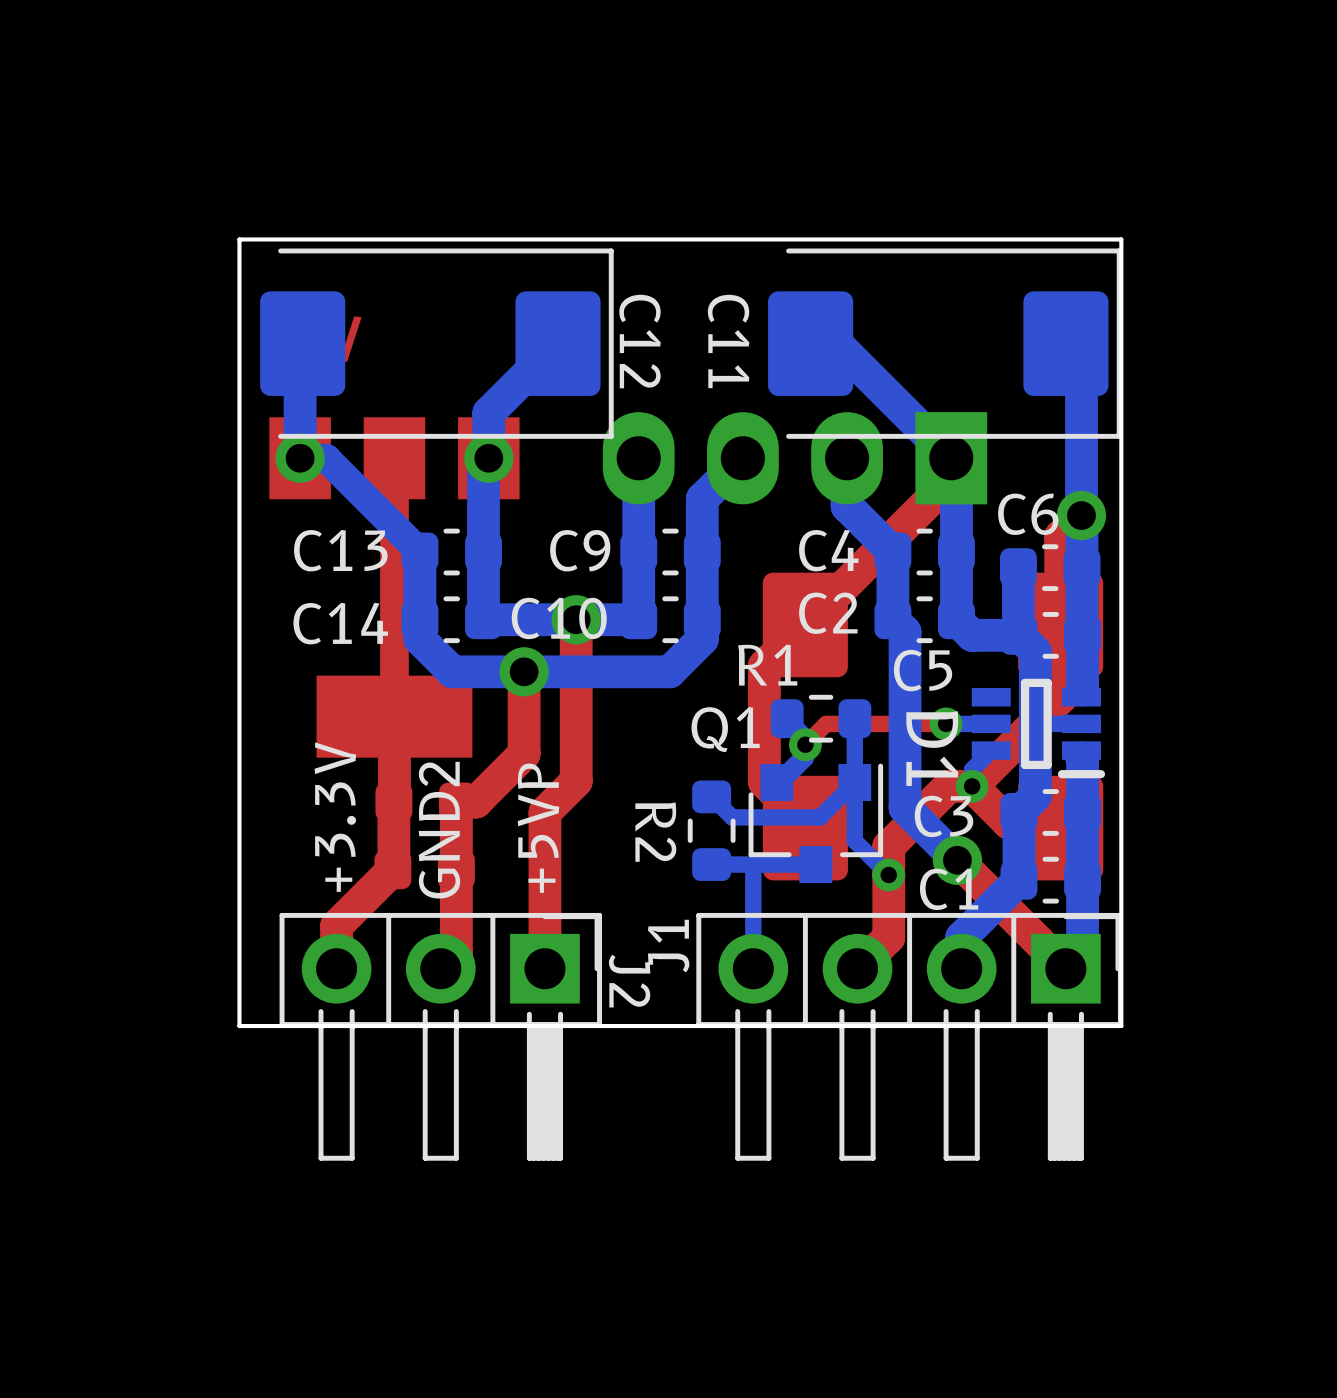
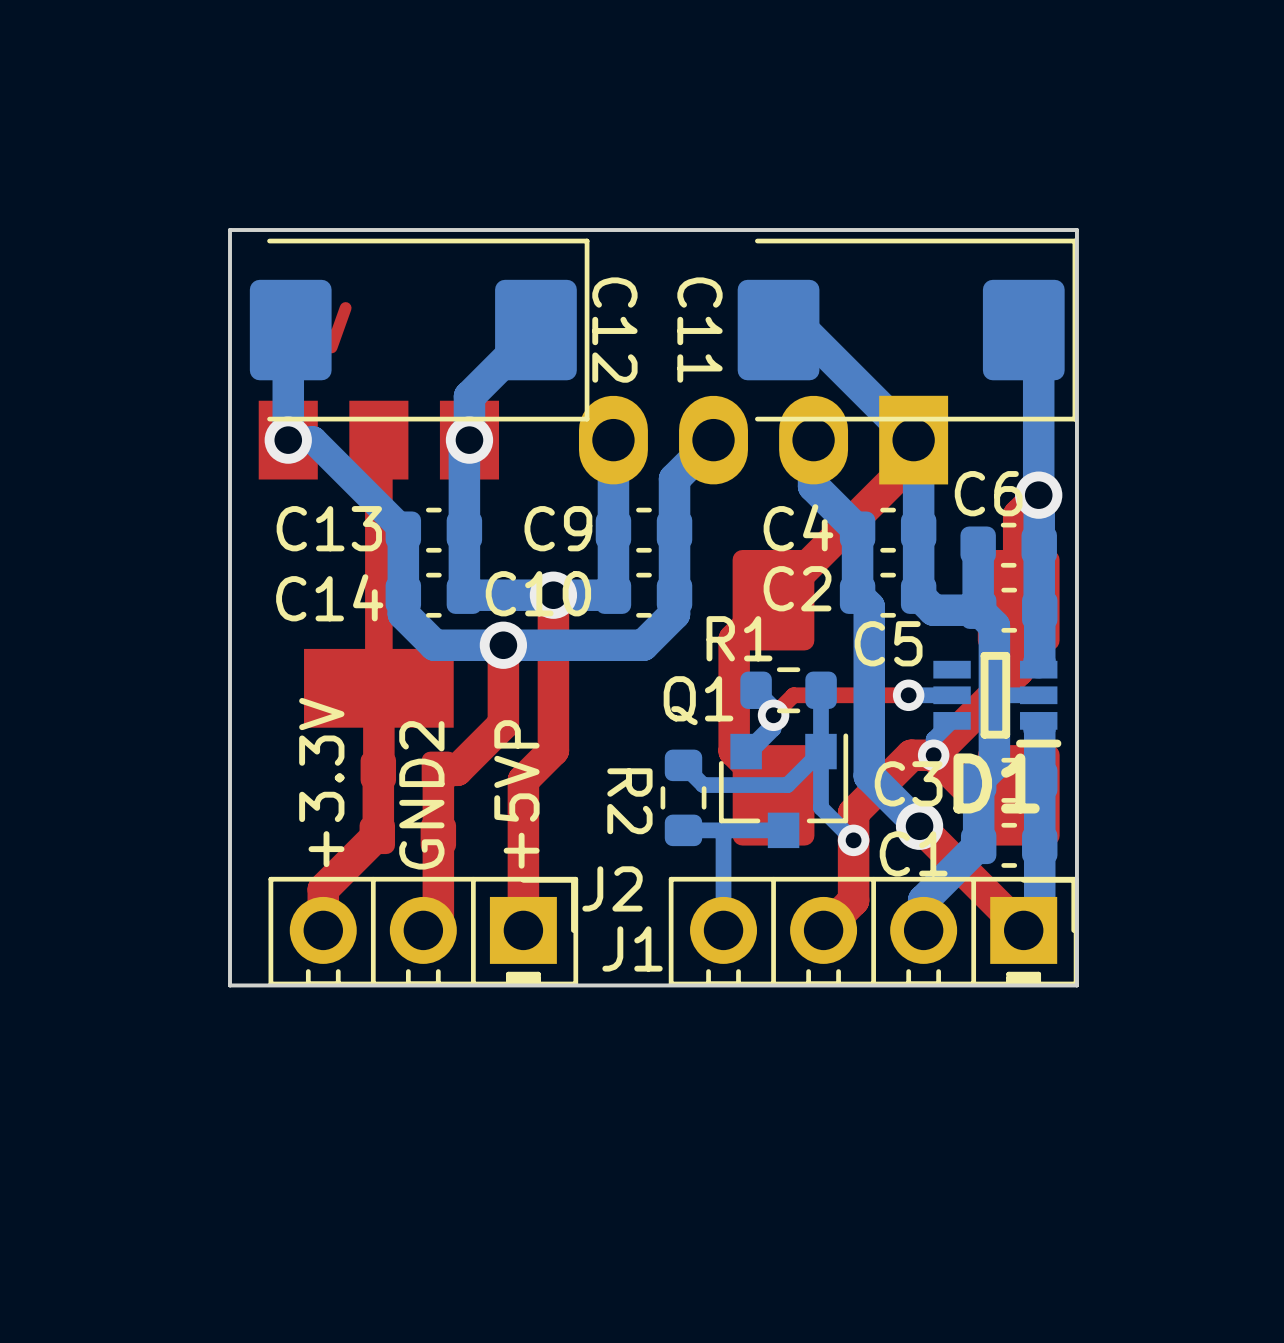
D1 name rotation: 0° (932, 748) -> 90° counterclockwise (996, 783)
J2 footprint: [279, 912, 602, 1161] -> [268, 876, 579, 987]
J1 footprint: [696, 912, 1123, 1161] -> [668, 876, 1079, 987]
J1 name position: J1 (668, 946) -> J1 (632, 948)

